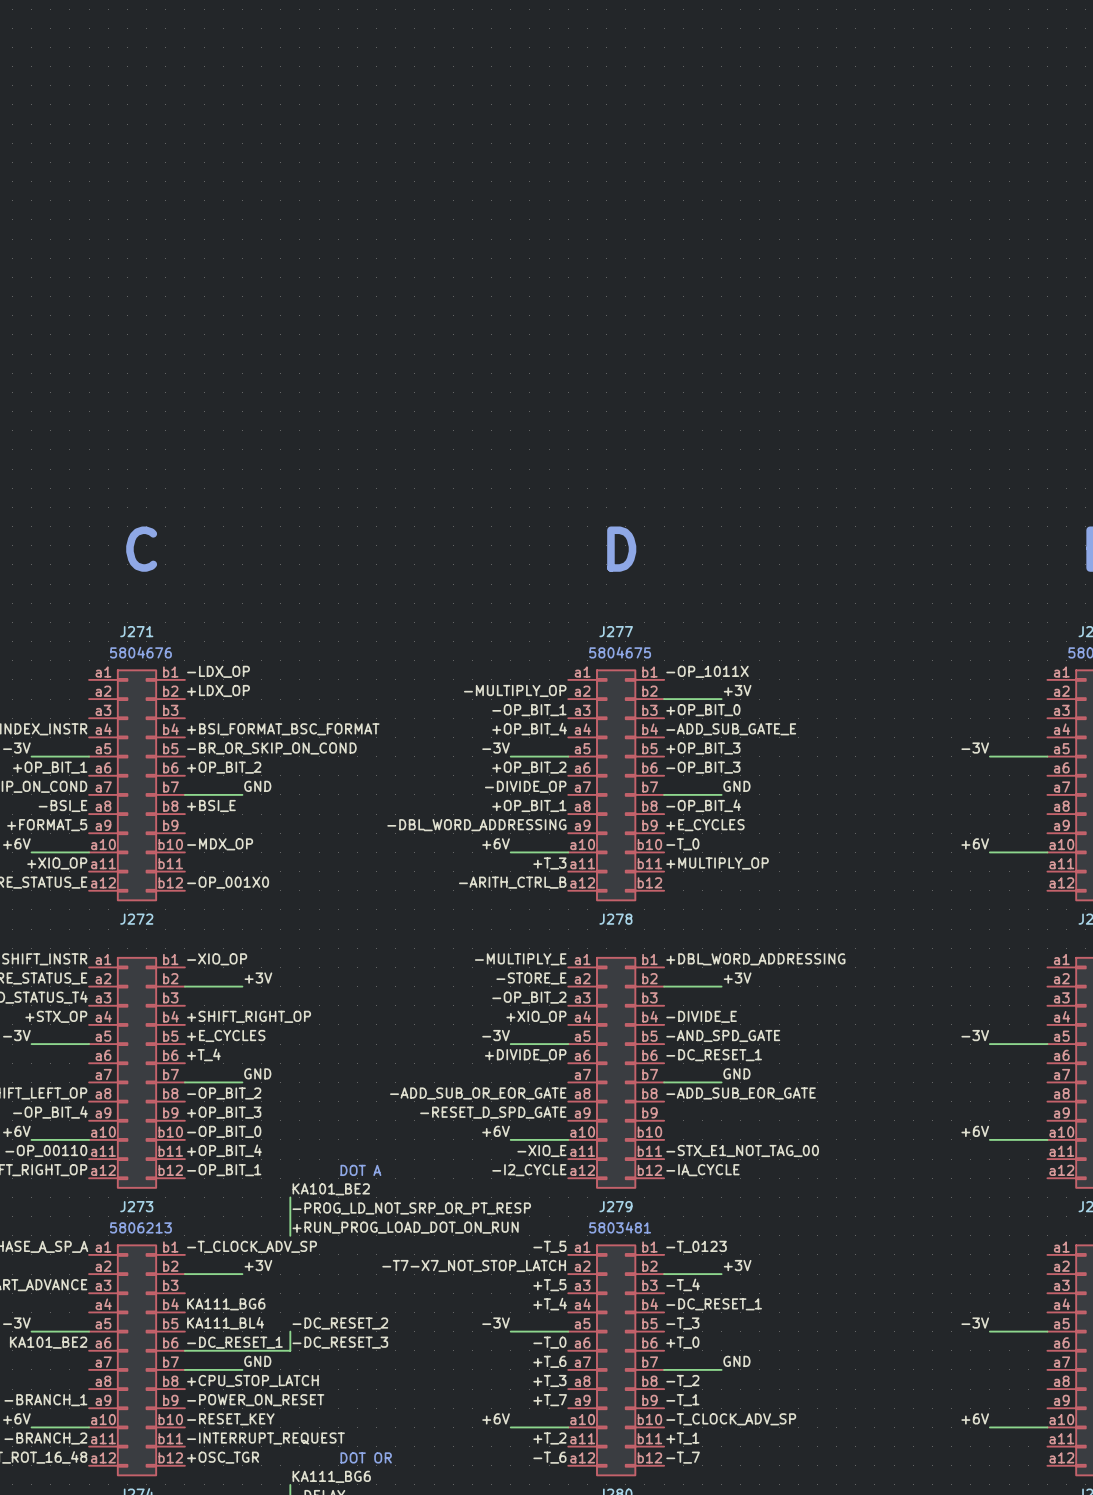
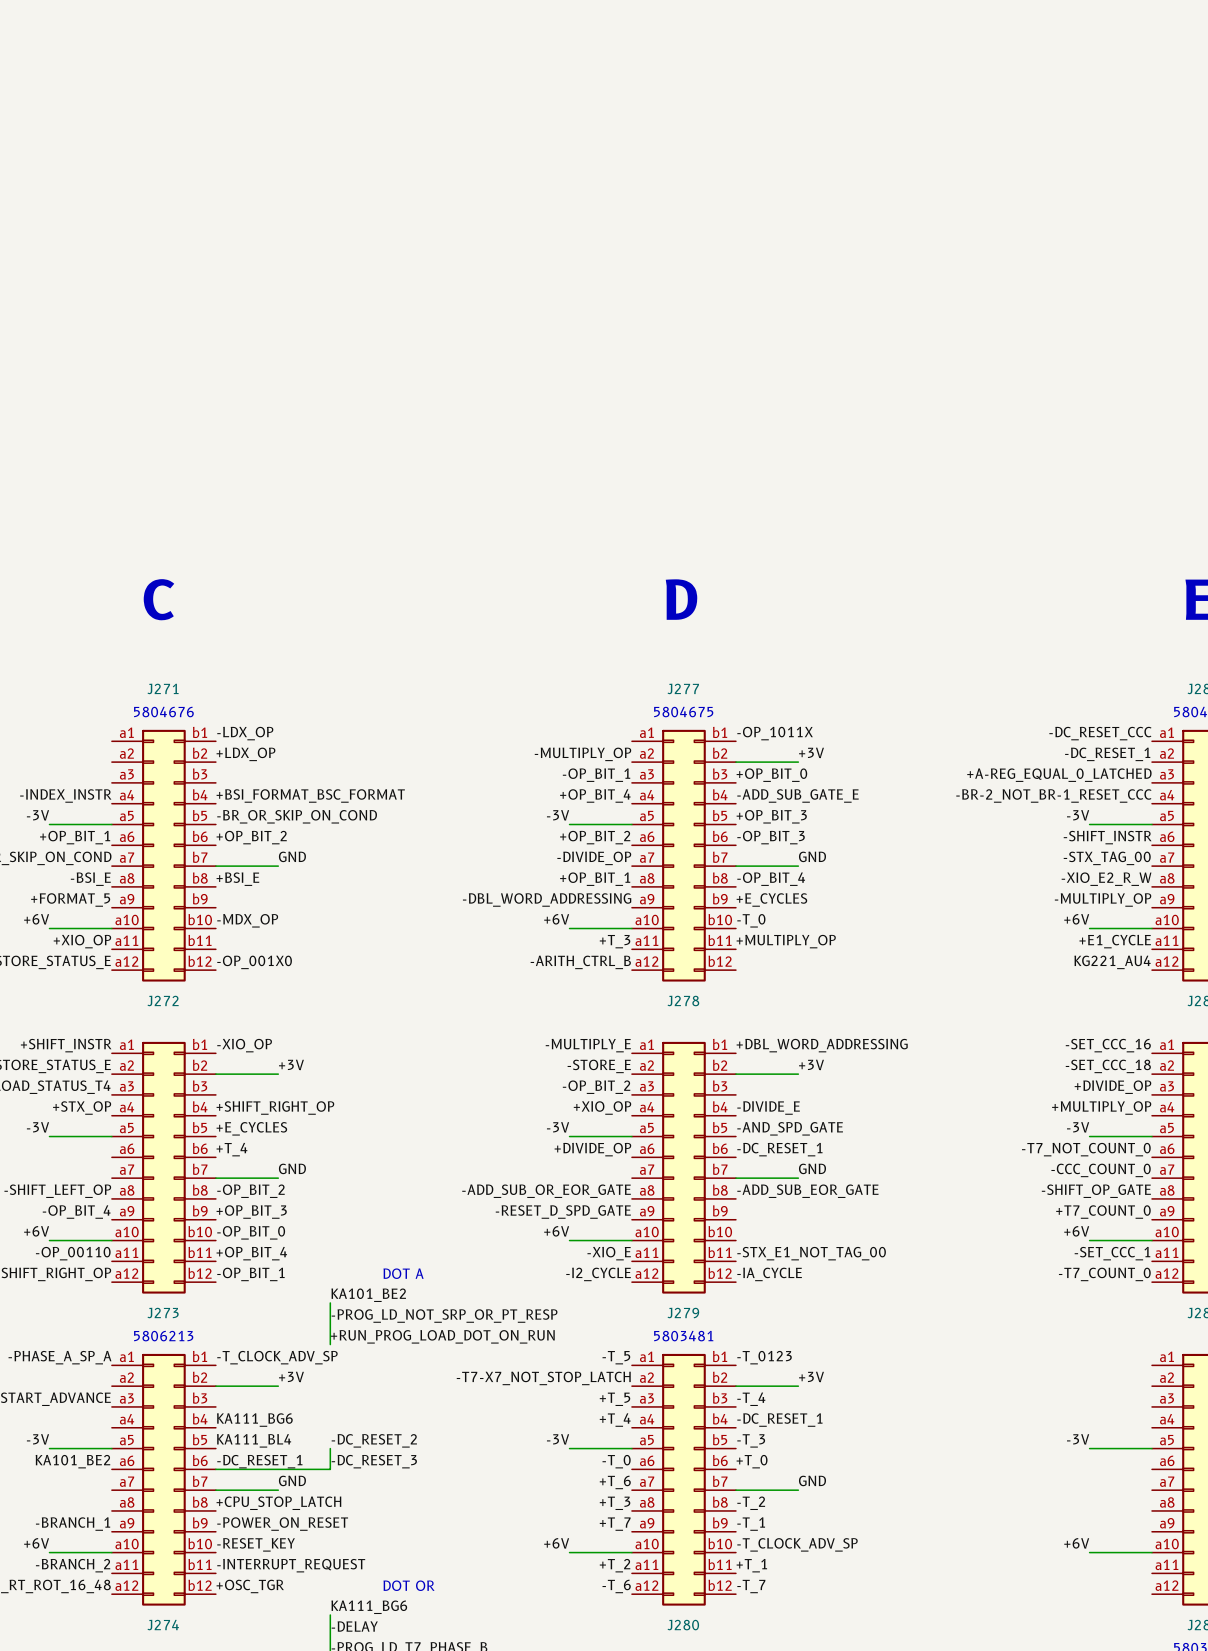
label: none -> -DC_RESET_CCC (1100, 733)
label: none -> -DC_RESET_1 (1107, 754)
label: none -> +A-REG_EQUAL_0_LATCHED (1059, 775)
label: none -> -BR-2_NOT_BR-1_RESET_CCC (1053, 795)
label: none -> -SHIFT_INSTR (1107, 837)
label: none -> -STX_TAG_00 (1107, 858)
label: none -> -XIO_E2_R_W (1106, 879)
label: none -> -MULTIPLY_OP (1103, 899)
label: none -> +E1_CYCLE (1115, 941)
label: none -> KG221_AU4 (1112, 962)
label: none -> -SET_CCC_16 (1108, 1045)
label: none -> -SET_CCC_18 (1108, 1066)
label: none -> +DIVIDE_OP (1112, 1087)
label: none -> +MULTIPLY_OP (1101, 1108)
label: none -> -T7_NOT_COUNT_0 (1086, 1149)
label: none -> -CCC_COUNT_0 (1101, 1170)
label: none -> -SHIFT_OP_GATE (1096, 1191)
label: none -> +T7_COUNT_0 (1103, 1212)
label: none -> -SET_CCC_1 (1112, 1253)
label: none -> -T7_COUNT_0 (1104, 1274)

